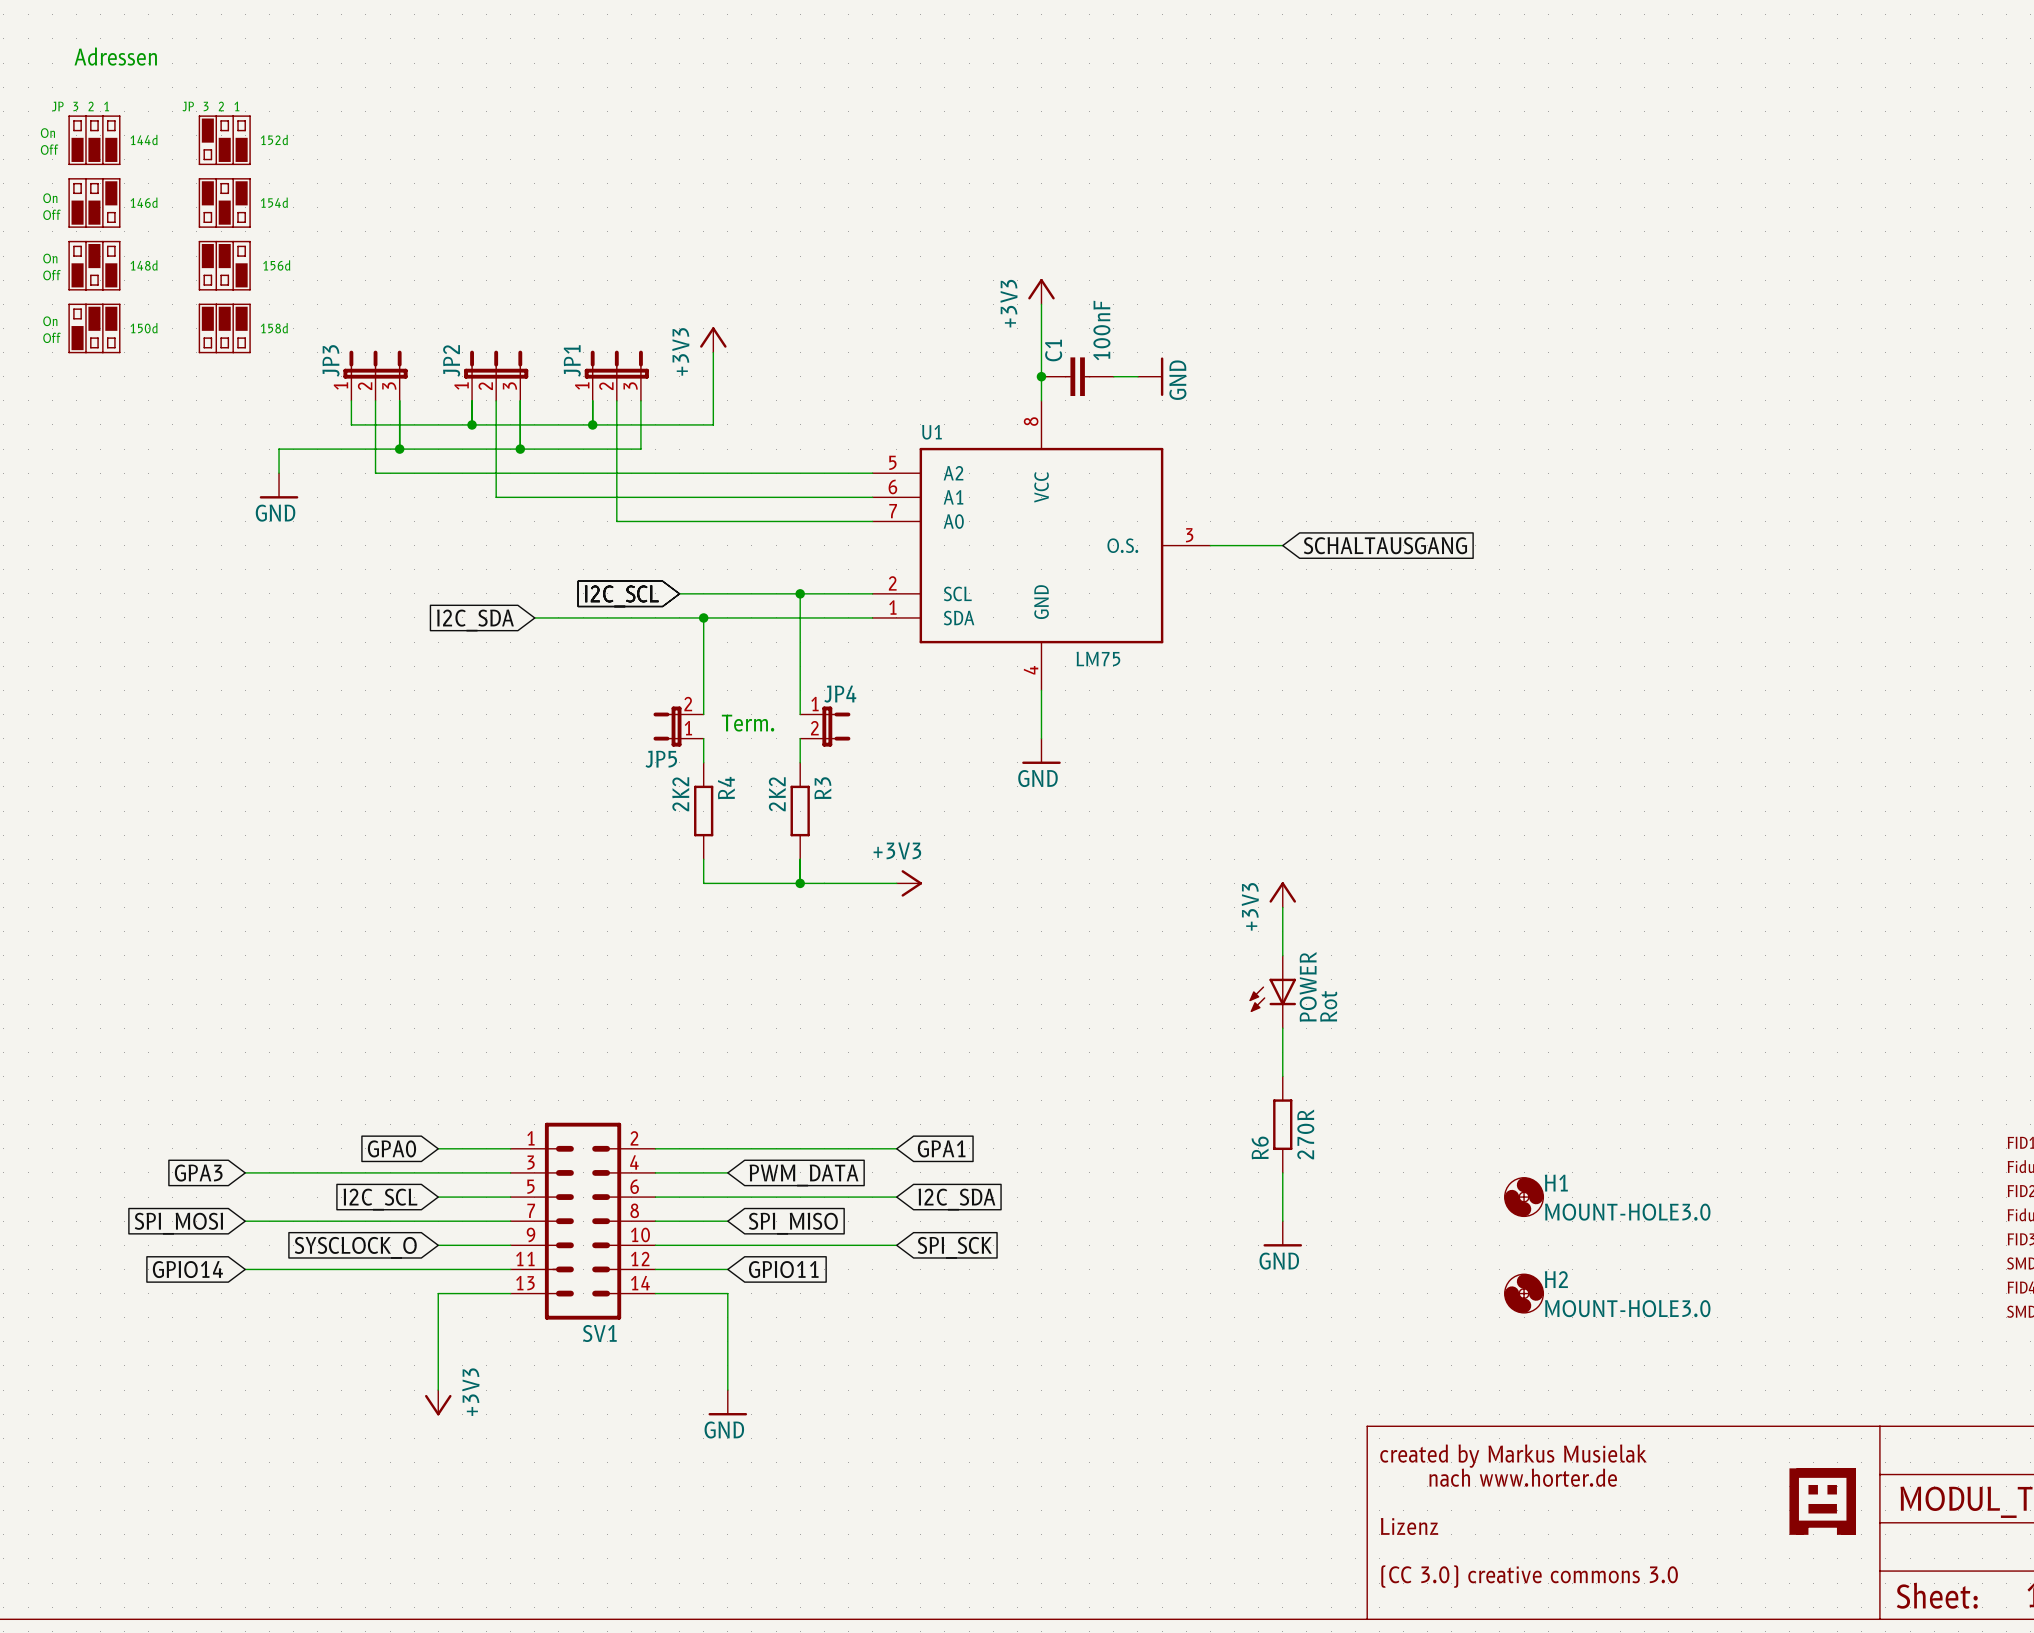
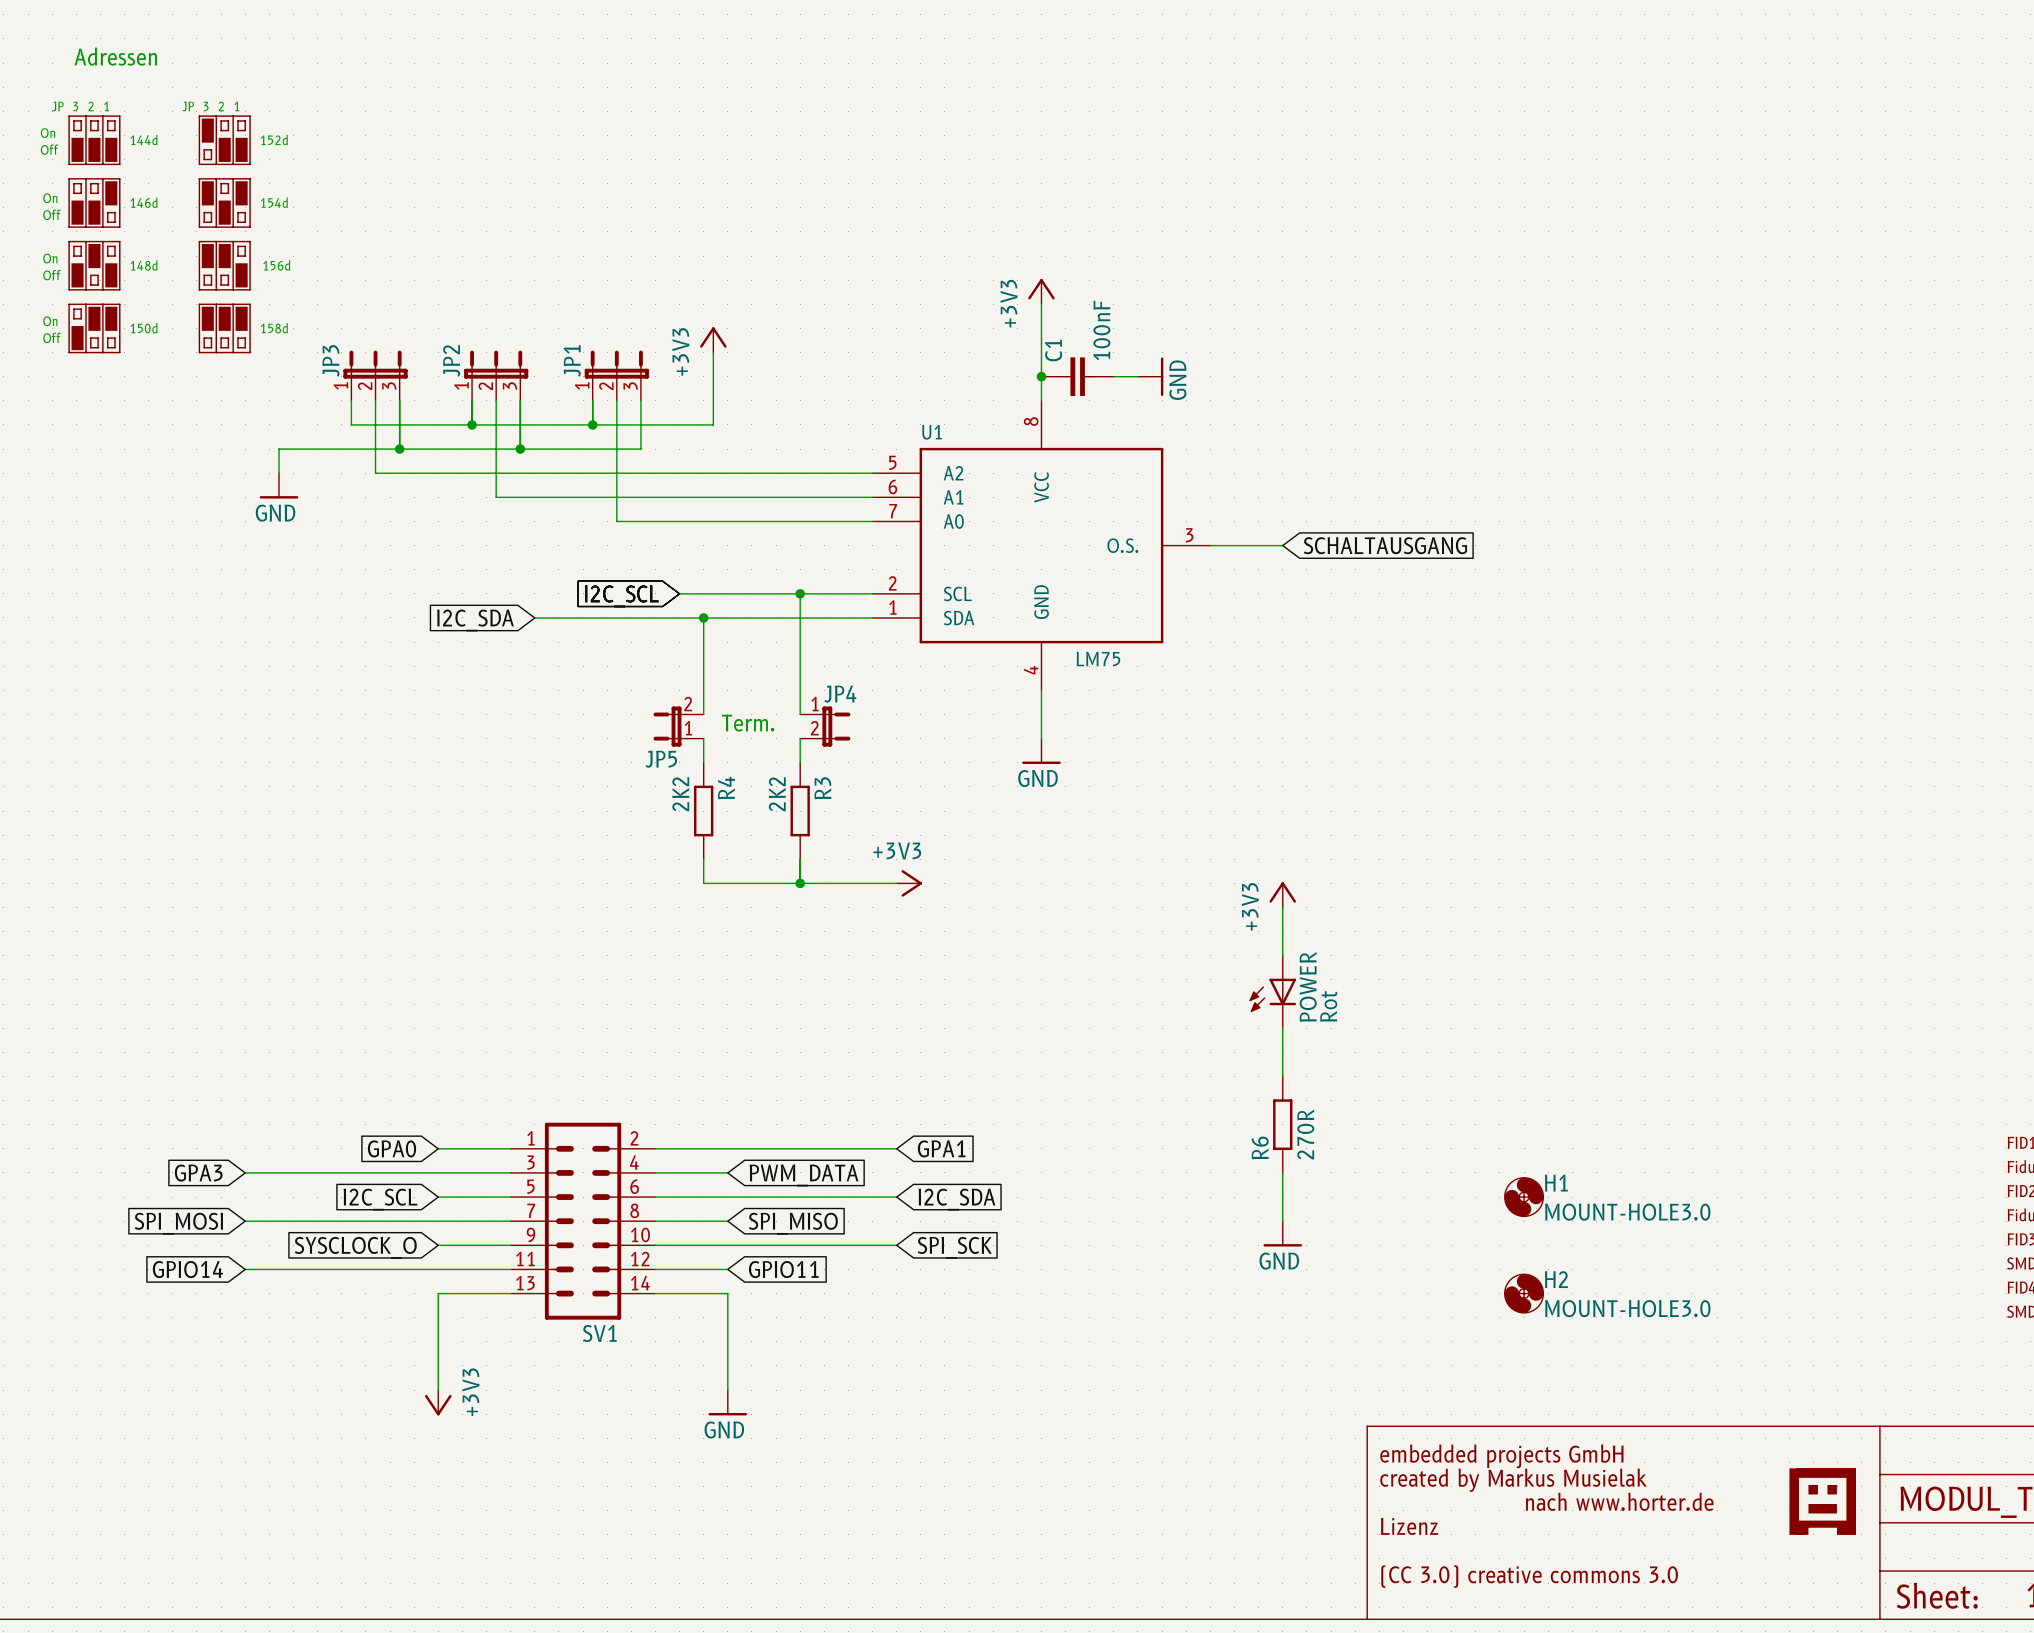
text: created by Markus Musielak (1513, 1456) -> embedded projects GmbH (1501, 1456)
text position: nach www.horter.de (1523, 1477) -> nach www.horter.de (1619, 1501)
text: none -> created by Markus Musielak (1513, 1480)

